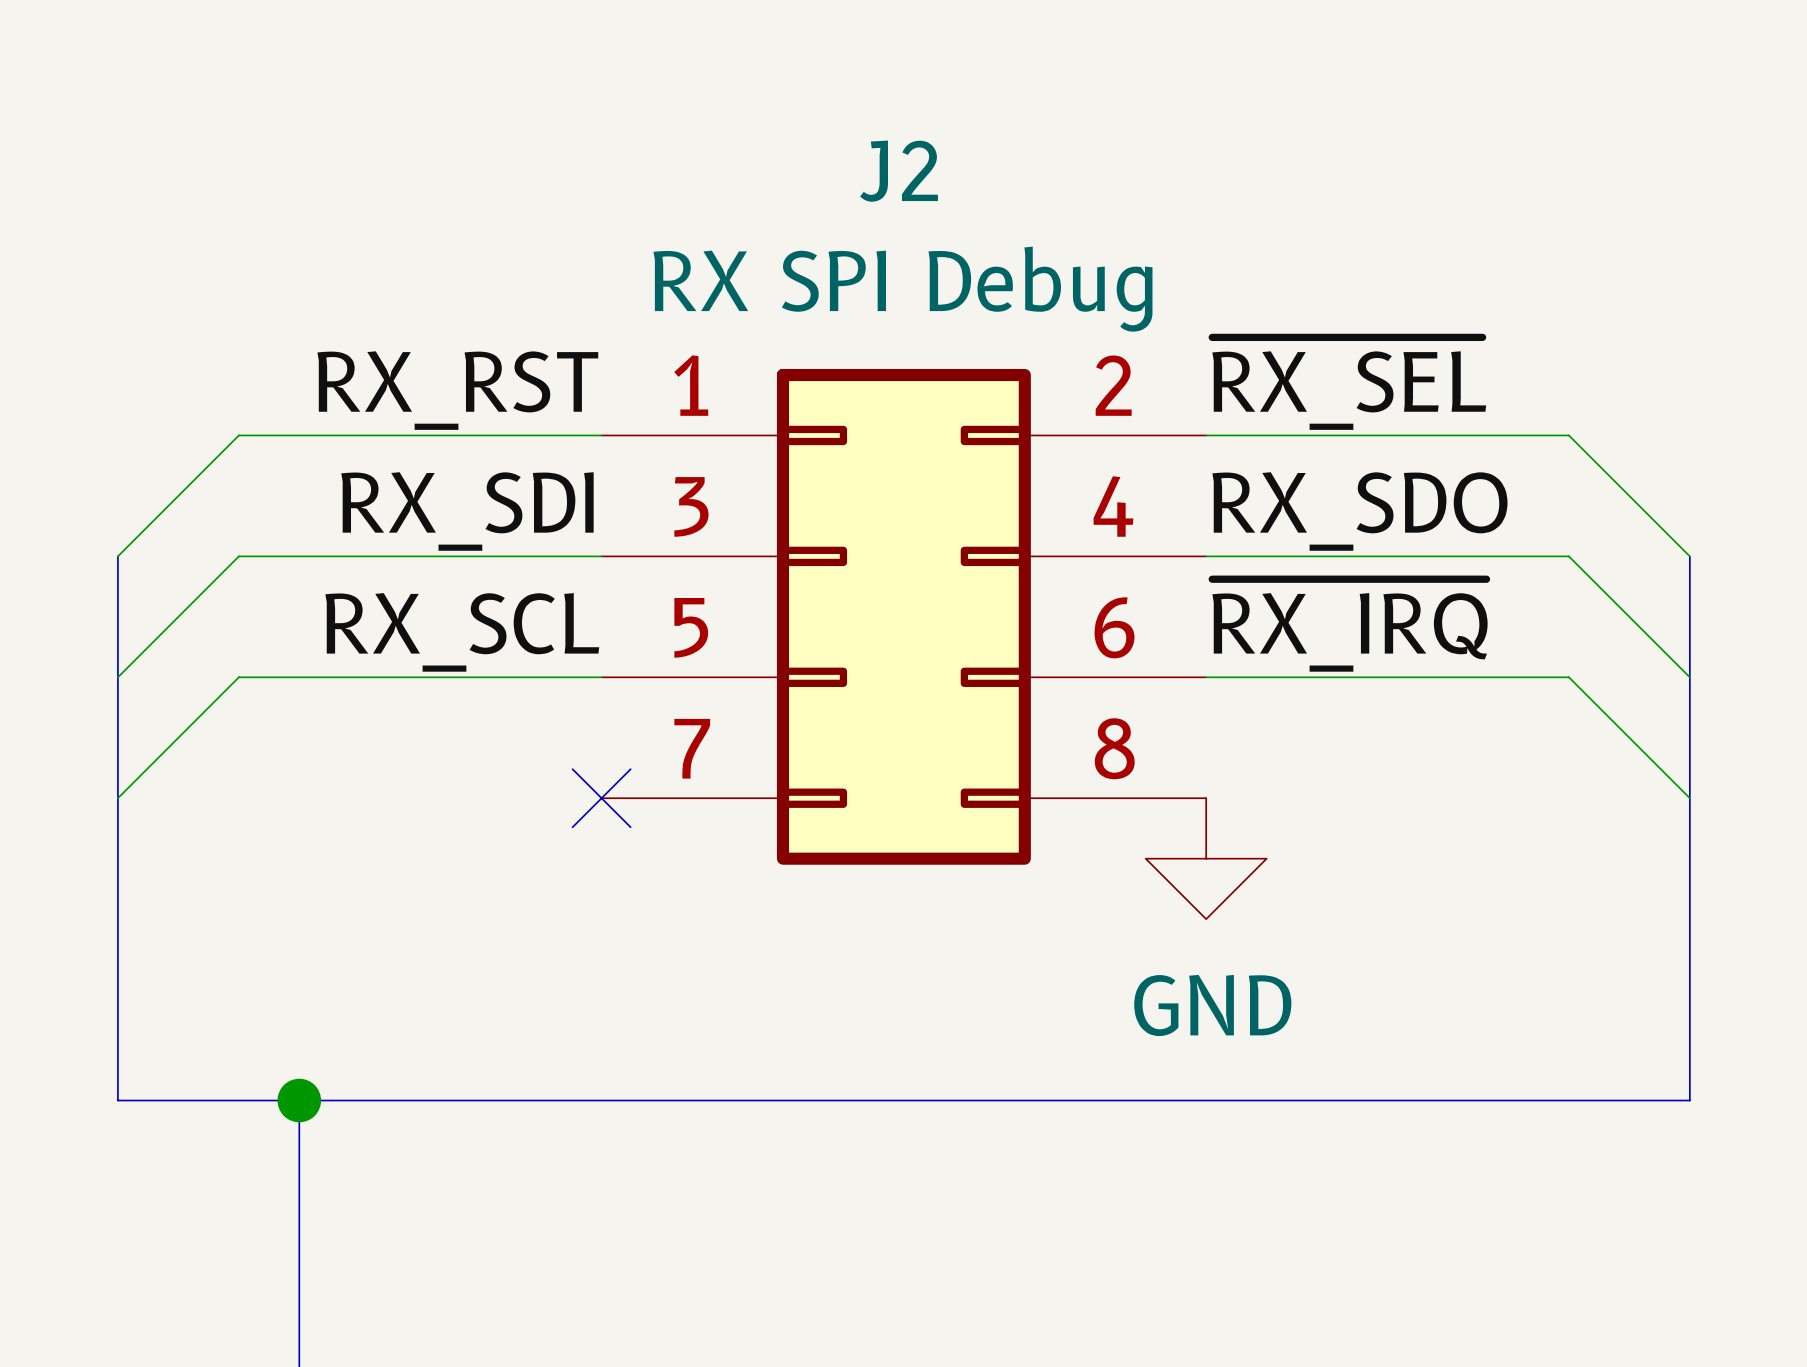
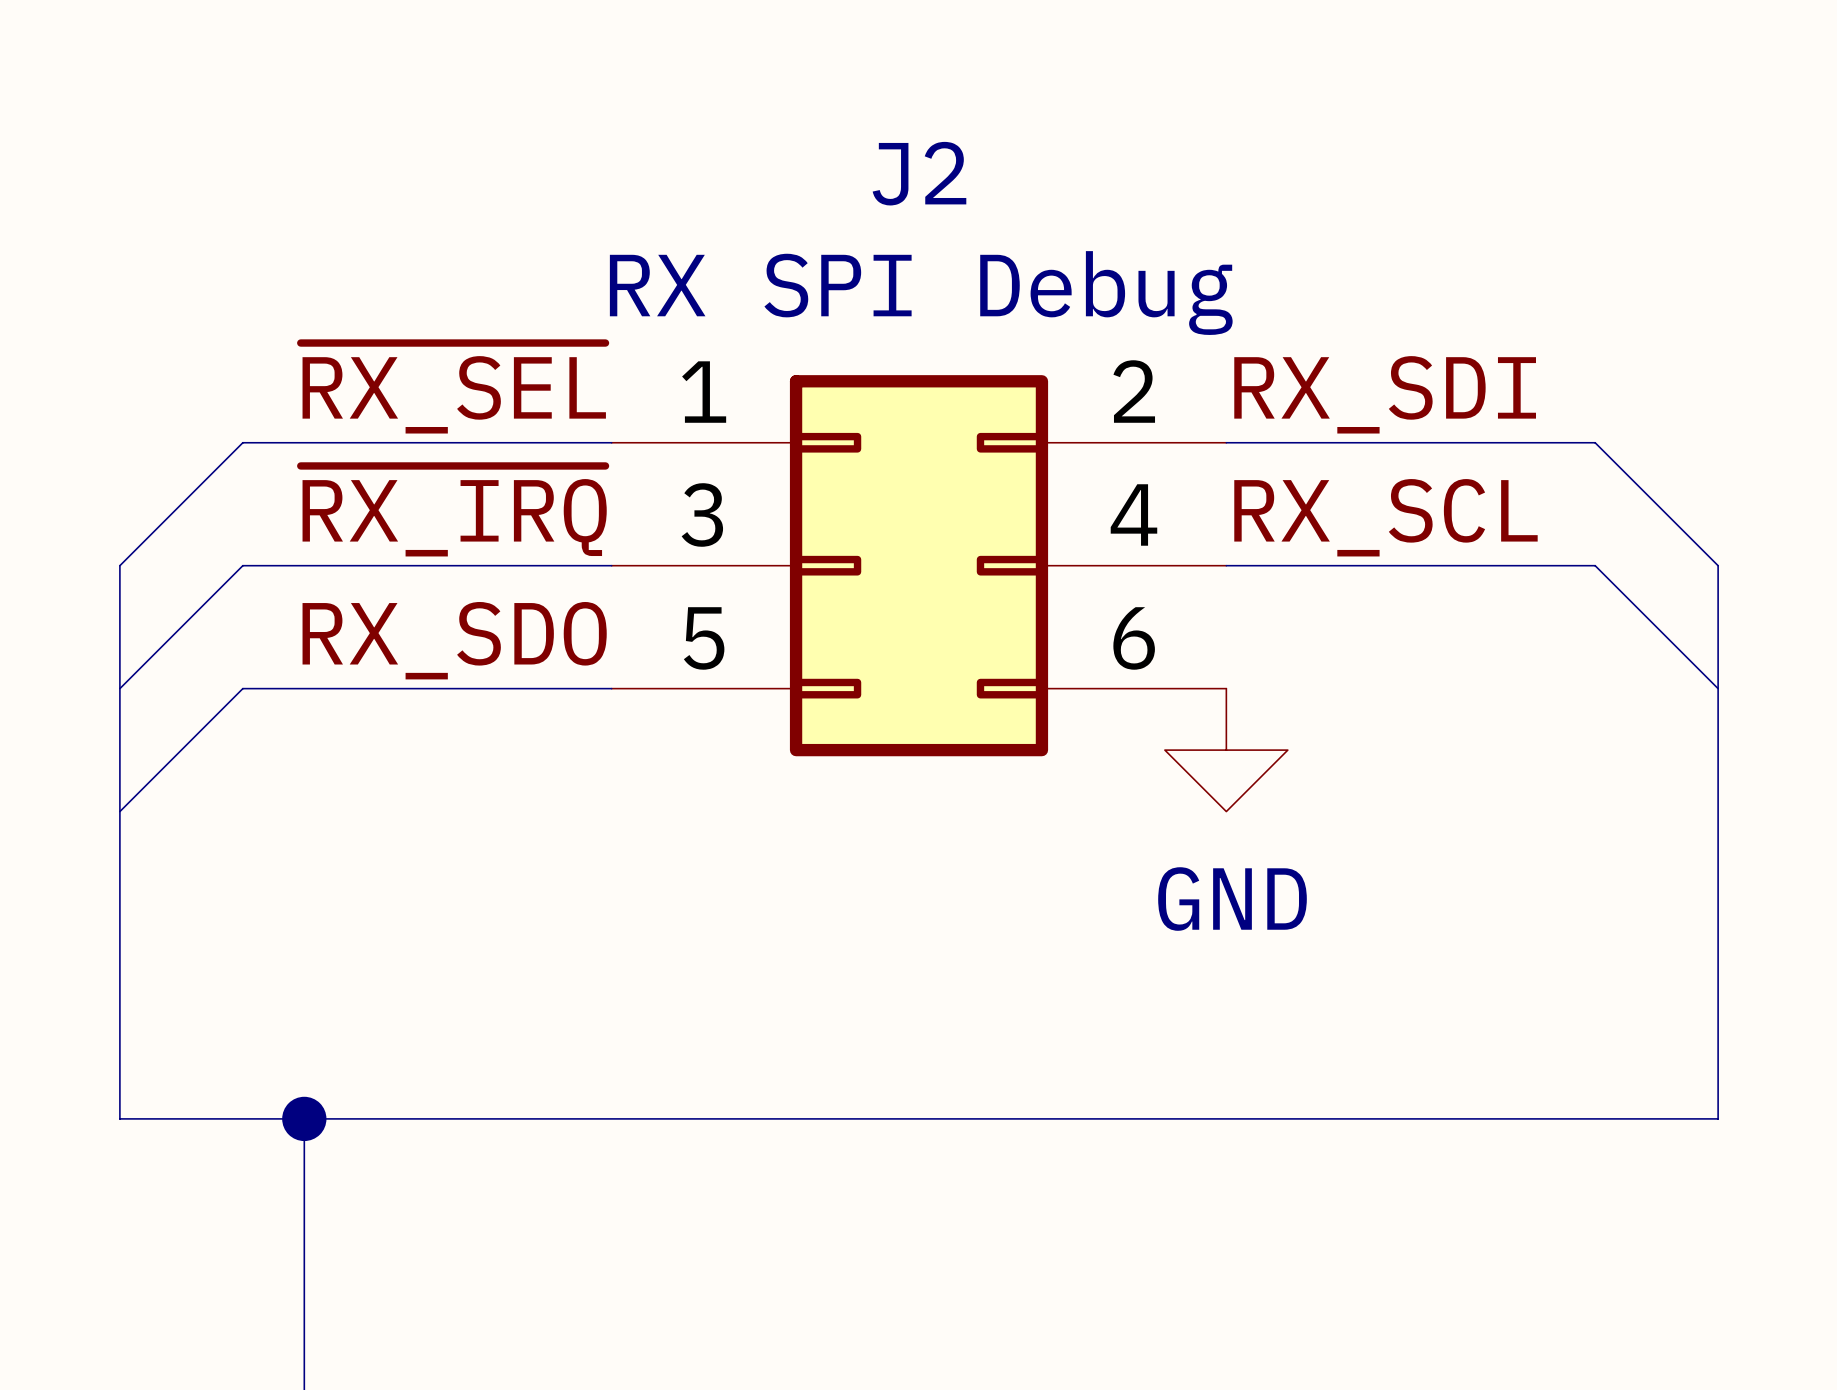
J2 symbol: [601, 368, 1207, 865] -> [611, 375, 1227, 757]
label: ~{RX_SEL} (1349, 383) -> RX_SDI (1385, 394)
label: RX_RST (457, 390) -> ~{RX_SEL} (453, 388)
label: RX_SDI (467, 511) -> ~{RX_IRQ} (453, 511)
label: RX_SDO (1359, 511) -> RX_SCL (1385, 517)
label: ~{RX_IRQ} (1349, 625) -> none
label: RX_SCL (462, 632) -> RX_SDO (454, 640)
wire: (1206, 677) (1568, 677) (1689, 798) -> none
no-connect mark: (601, 798) -> none
power symbol position: GND (1206, 858) -> GND (1226, 750)

